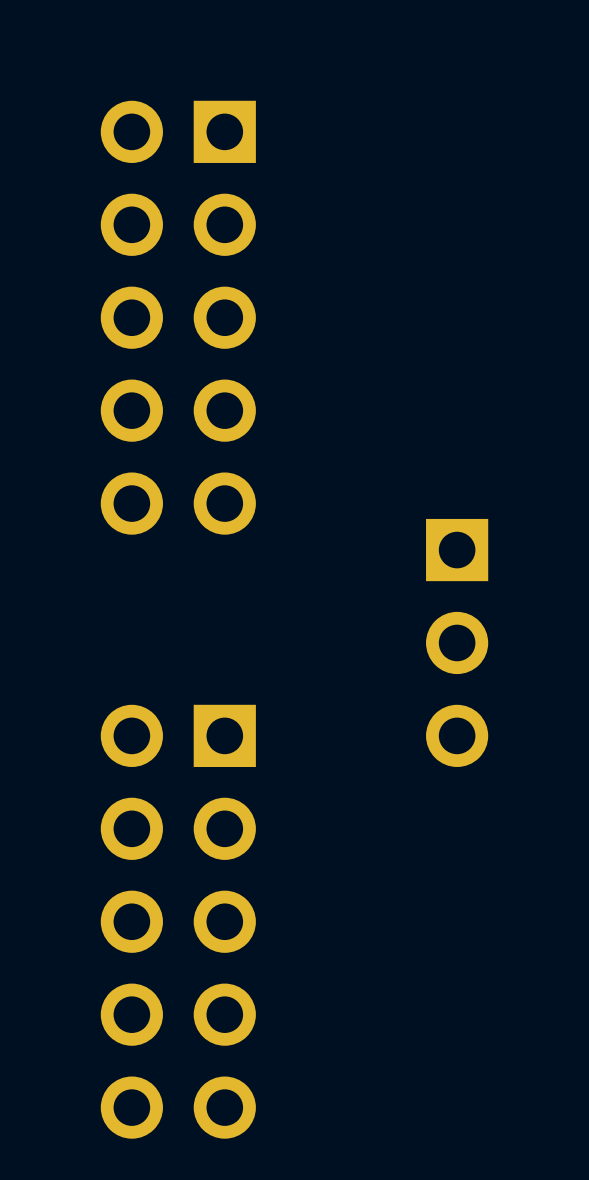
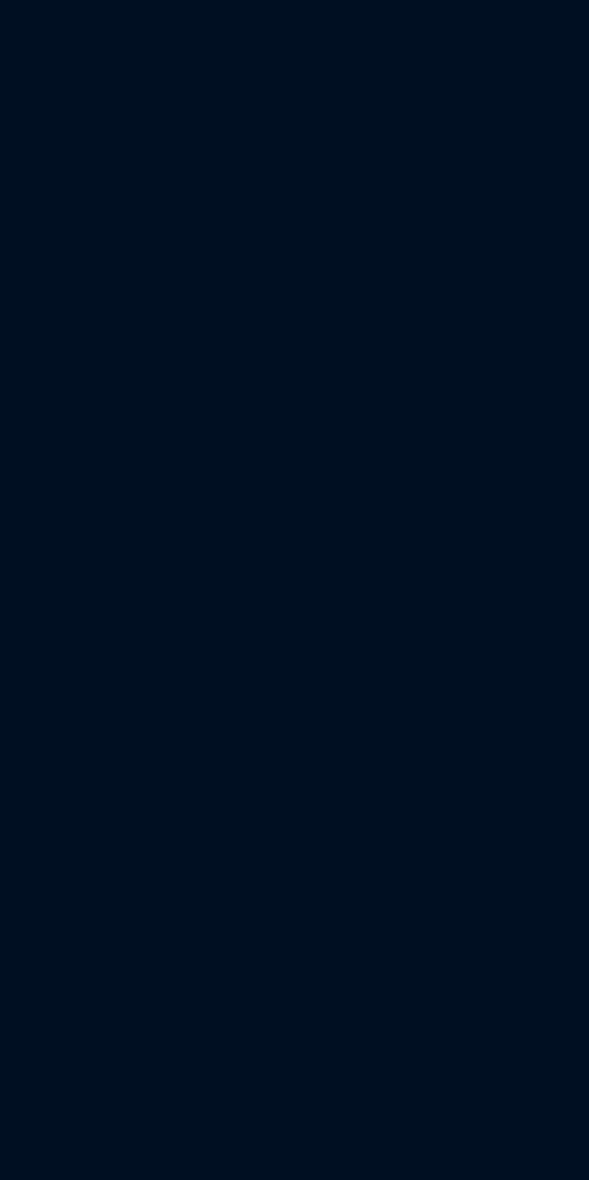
part: (178, 317) -> none
part: (457, 642) -> none
part: (178, 921) -> none

